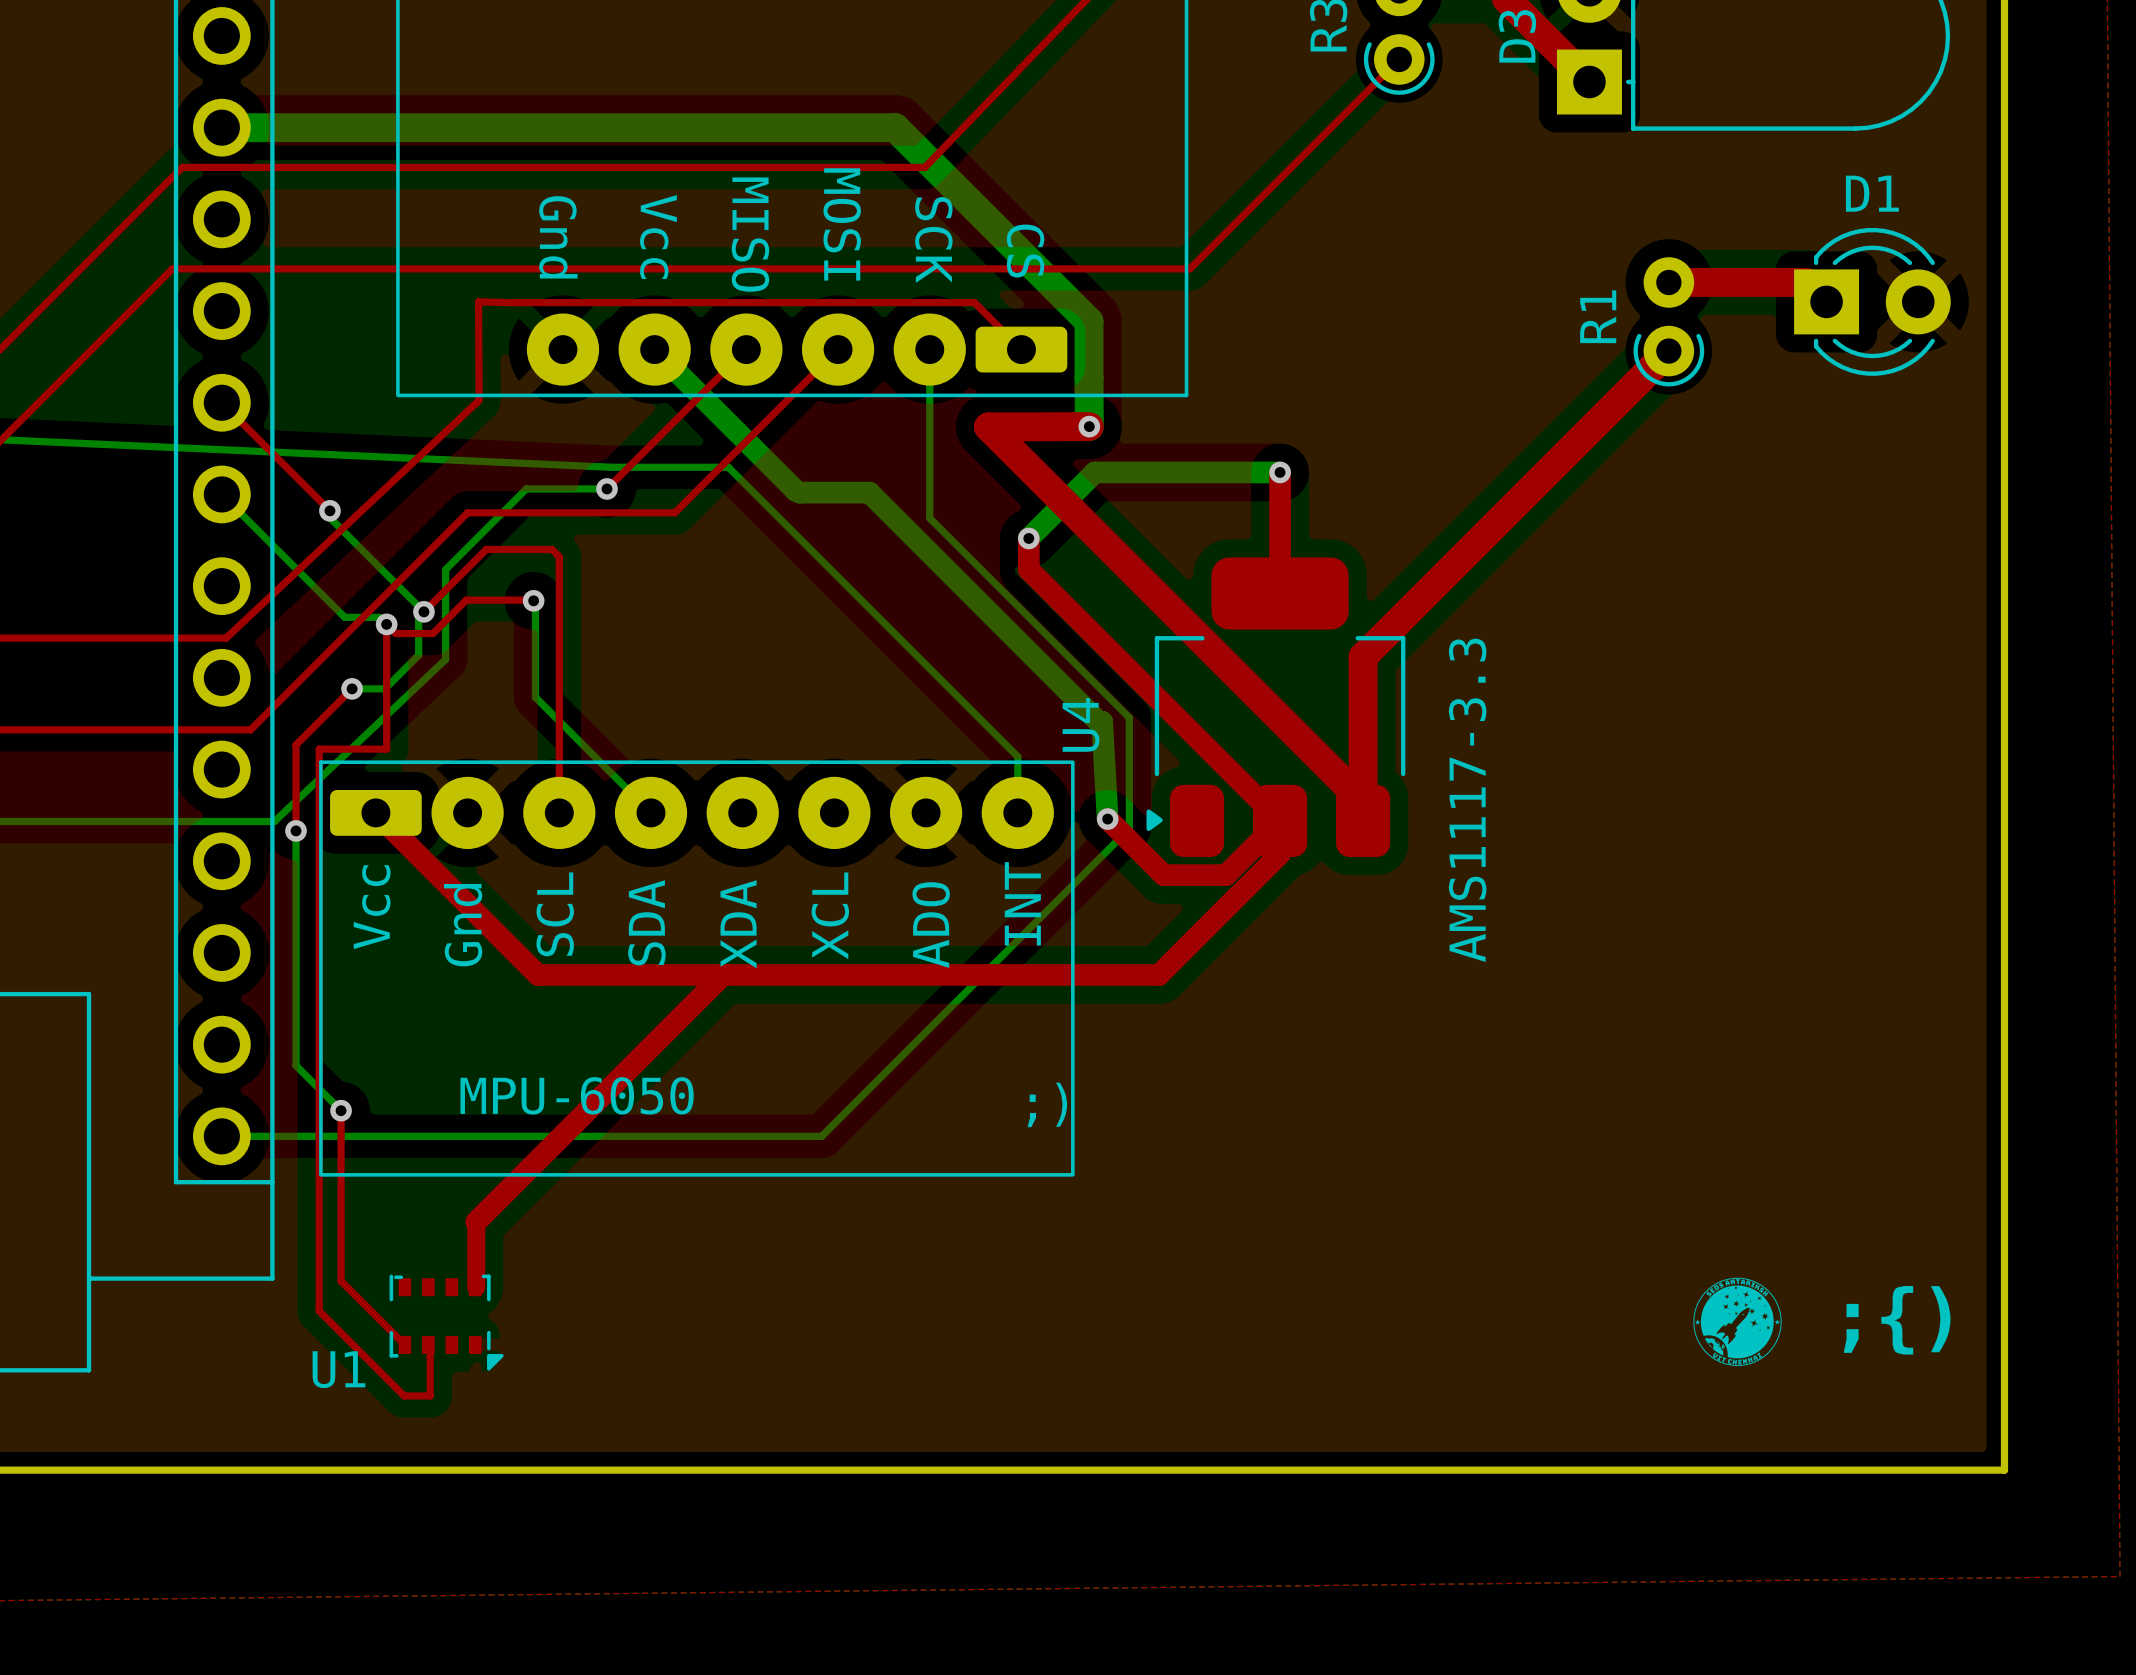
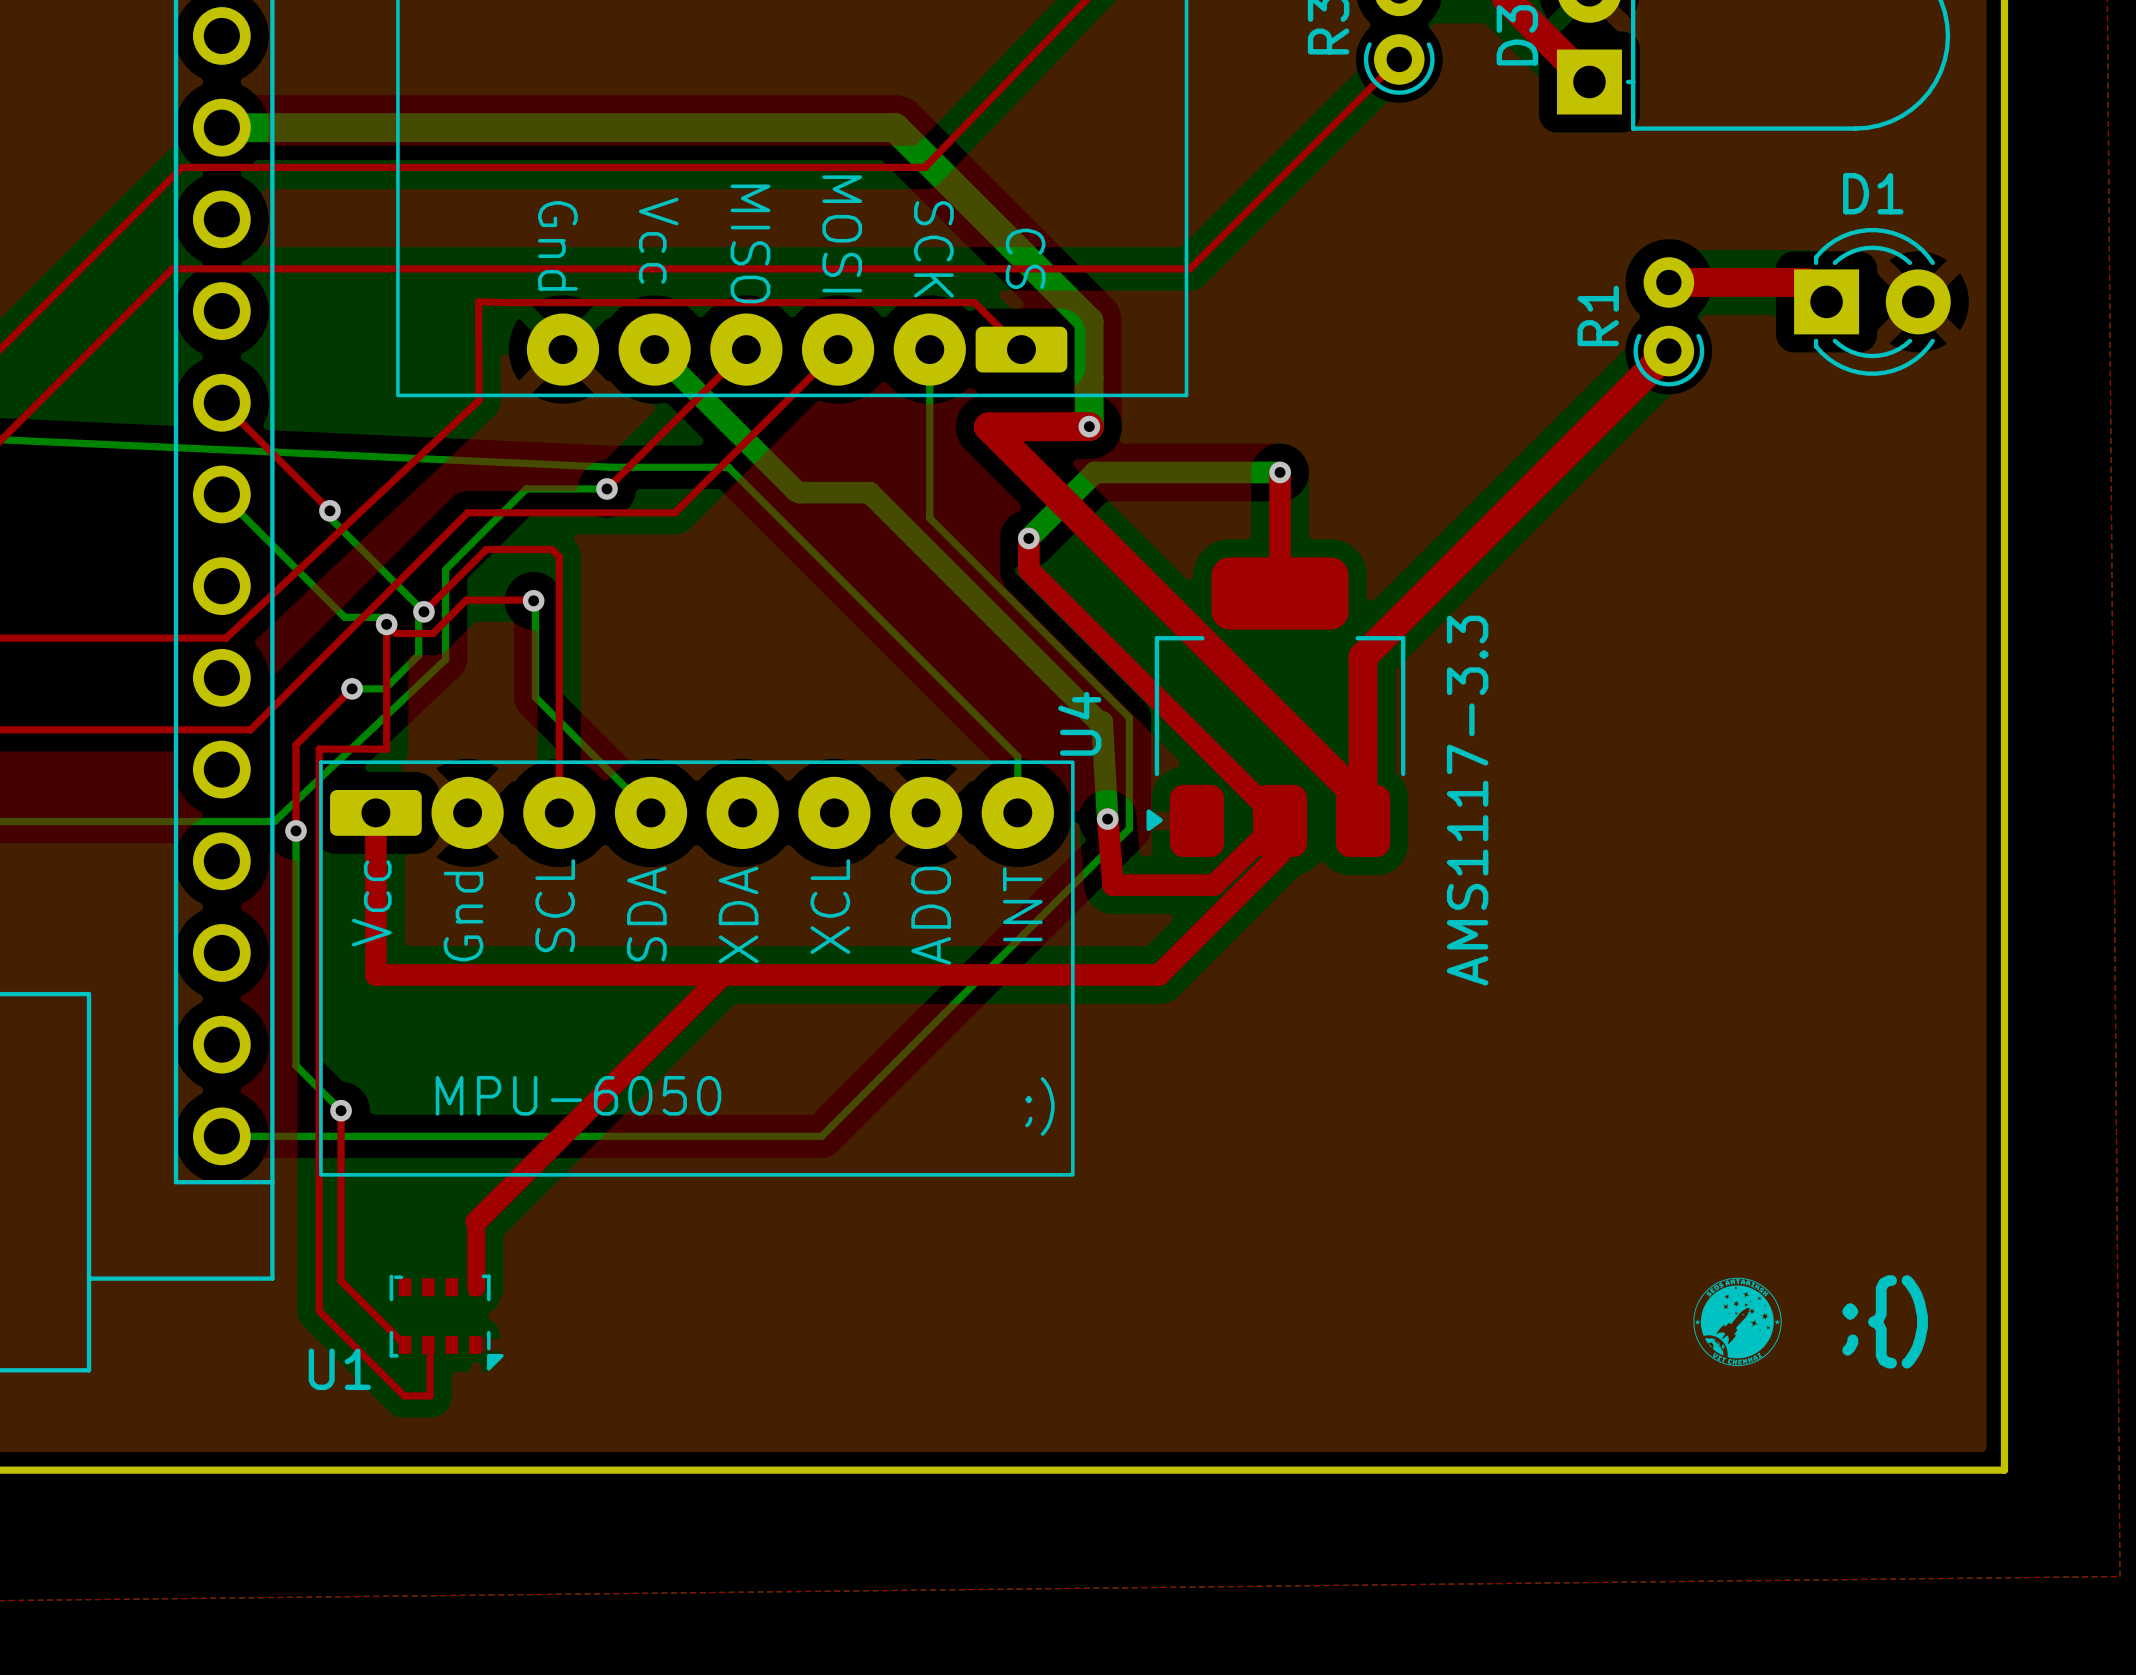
top track: (375, 812) (537, 974) -> (375, 812) (375, 974) (537, 974)
top track: (1107, 819) (1163, 875) (1225, 875) (1280, 820) -> (1107, 819) (1113, 885) (1214, 885) (1280, 820)

